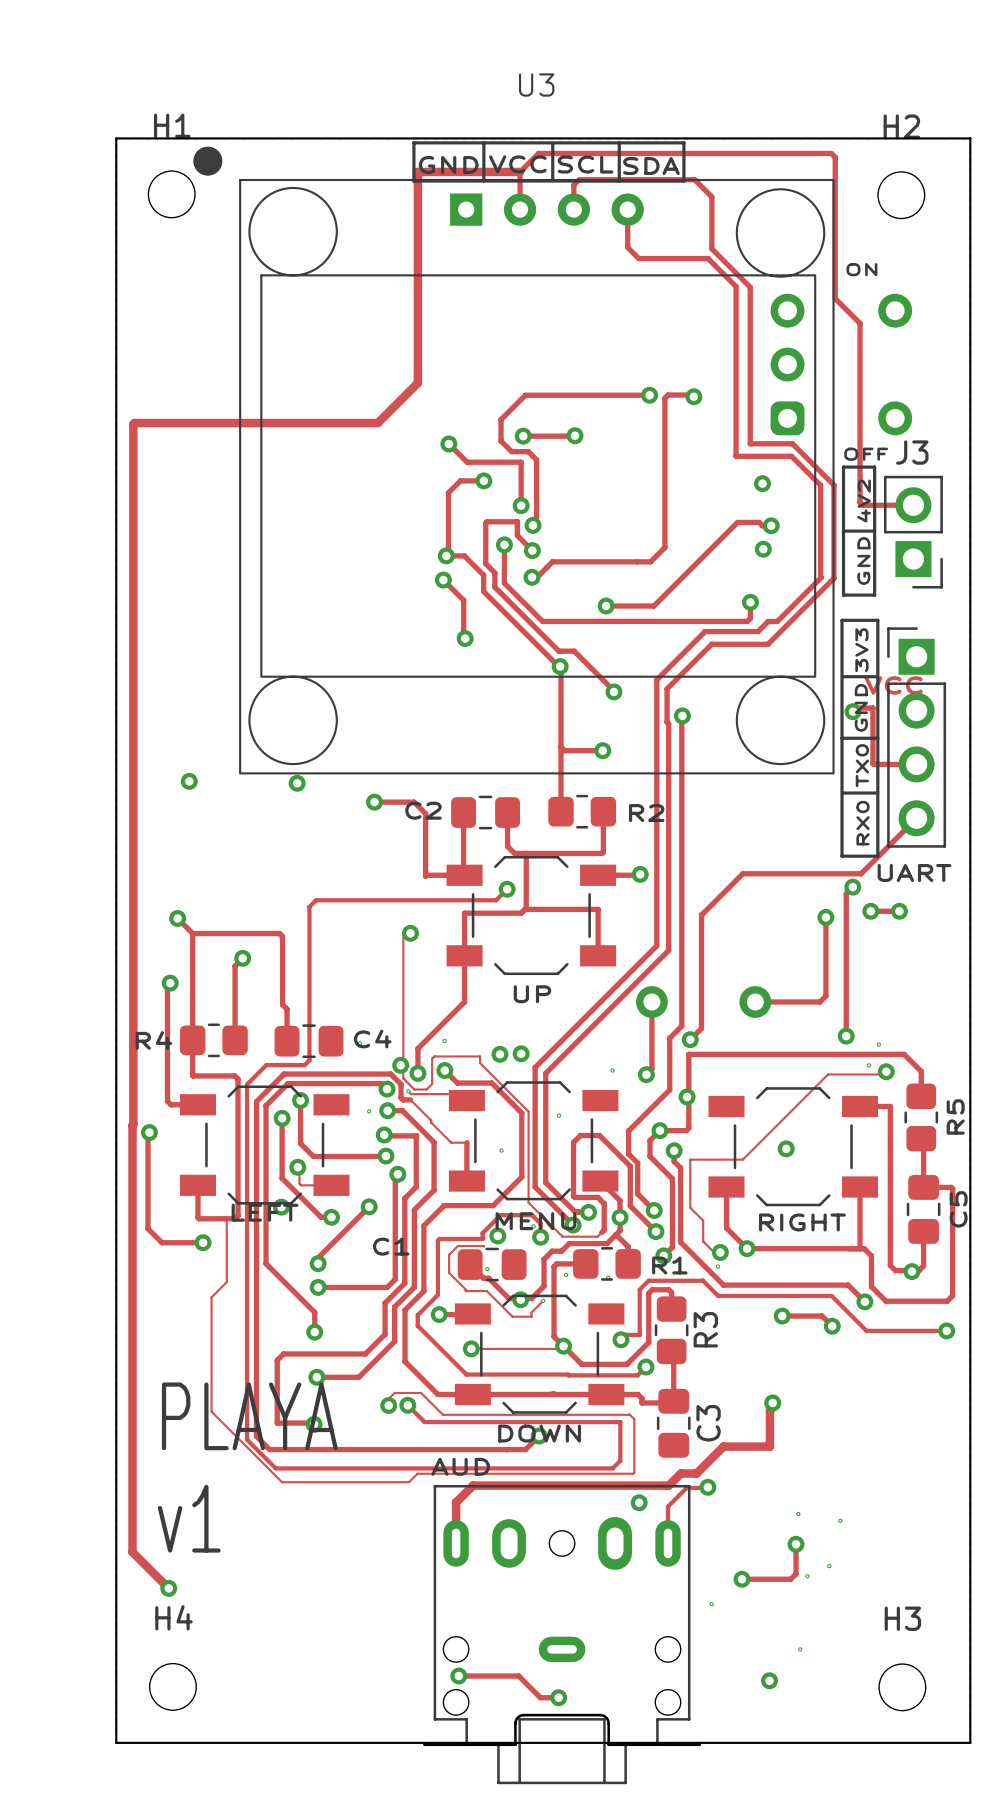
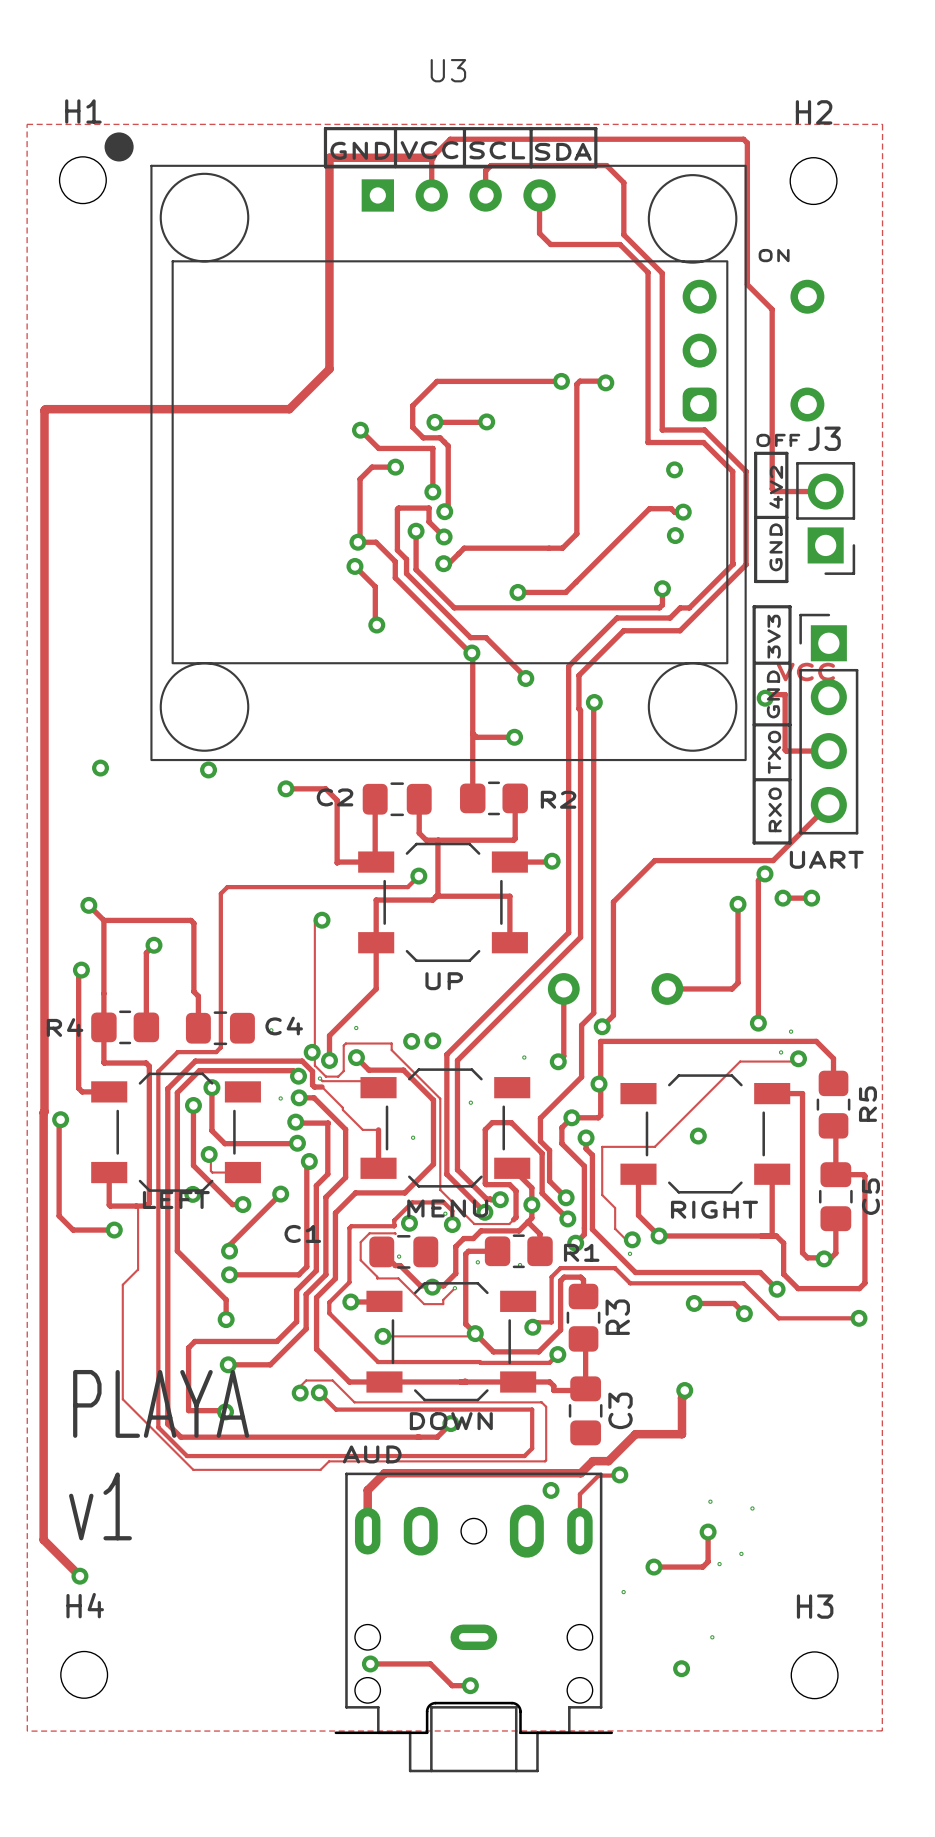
board edge: (116, 138) (970, 138) (970, 1742) (116, 1742) (116, 138) -> none

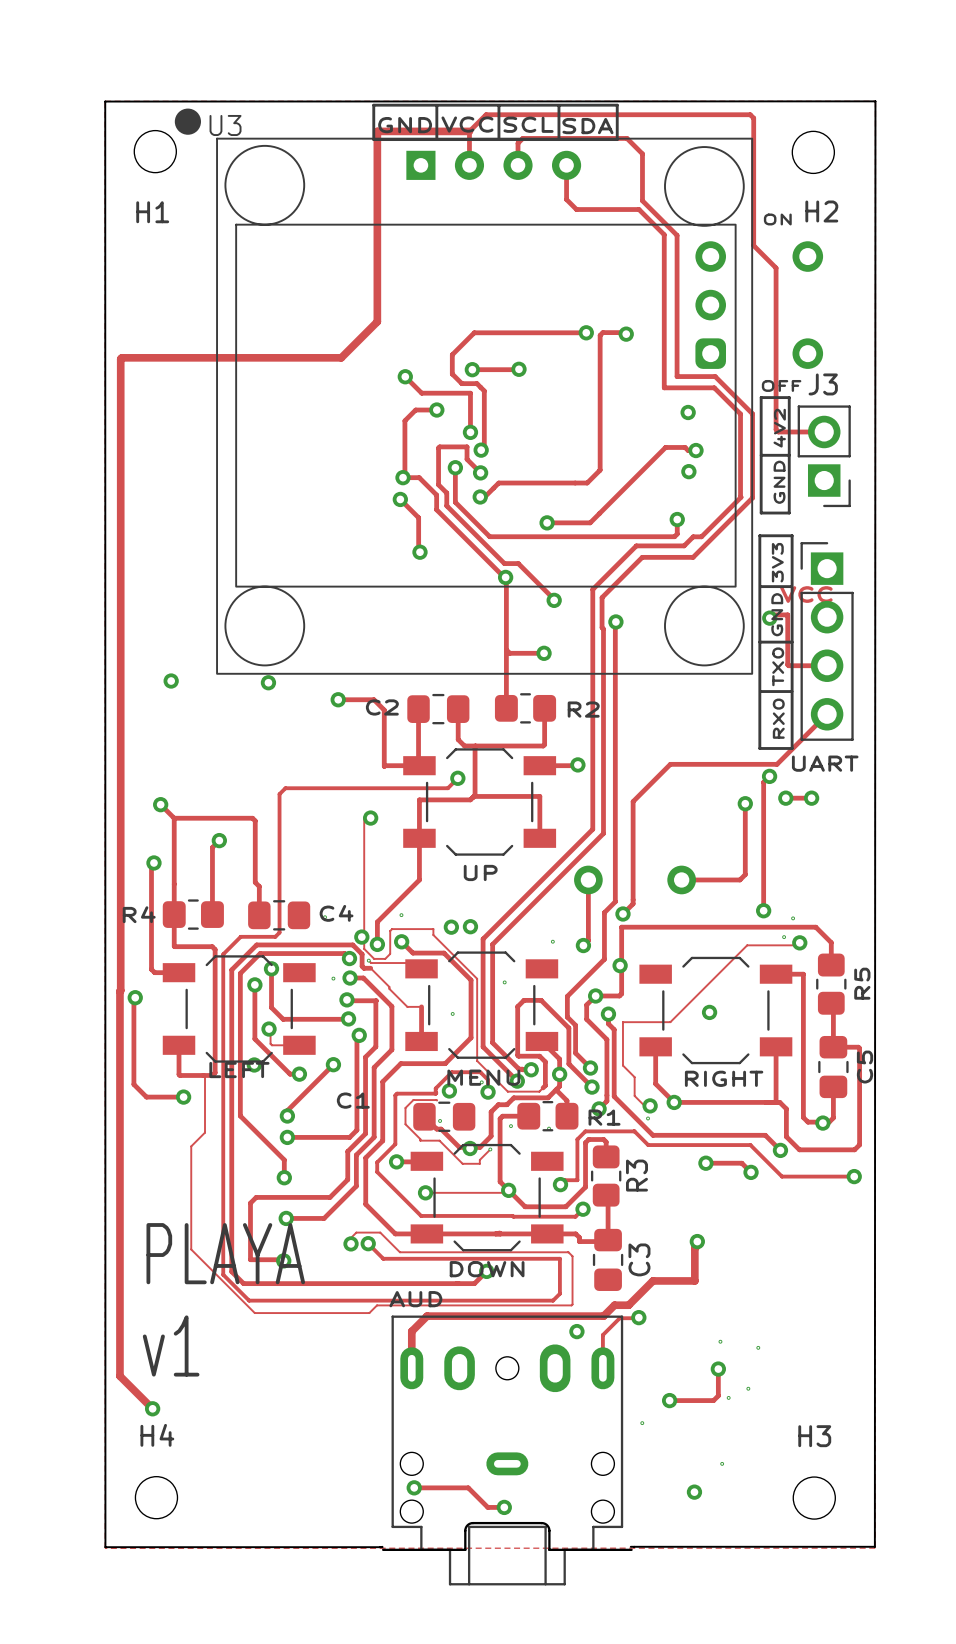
U3 name position: U3 (448, 70) -> U3 (225, 125)
H1 name position: H1 (83, 111) -> H1 (152, 212)
H2 name position: H2 (814, 112) -> H2 (821, 211)
board edge: none -> (630, 1546) (874, 1546) (875, 101) (105, 101) (105, 1547) (382, 1547)

